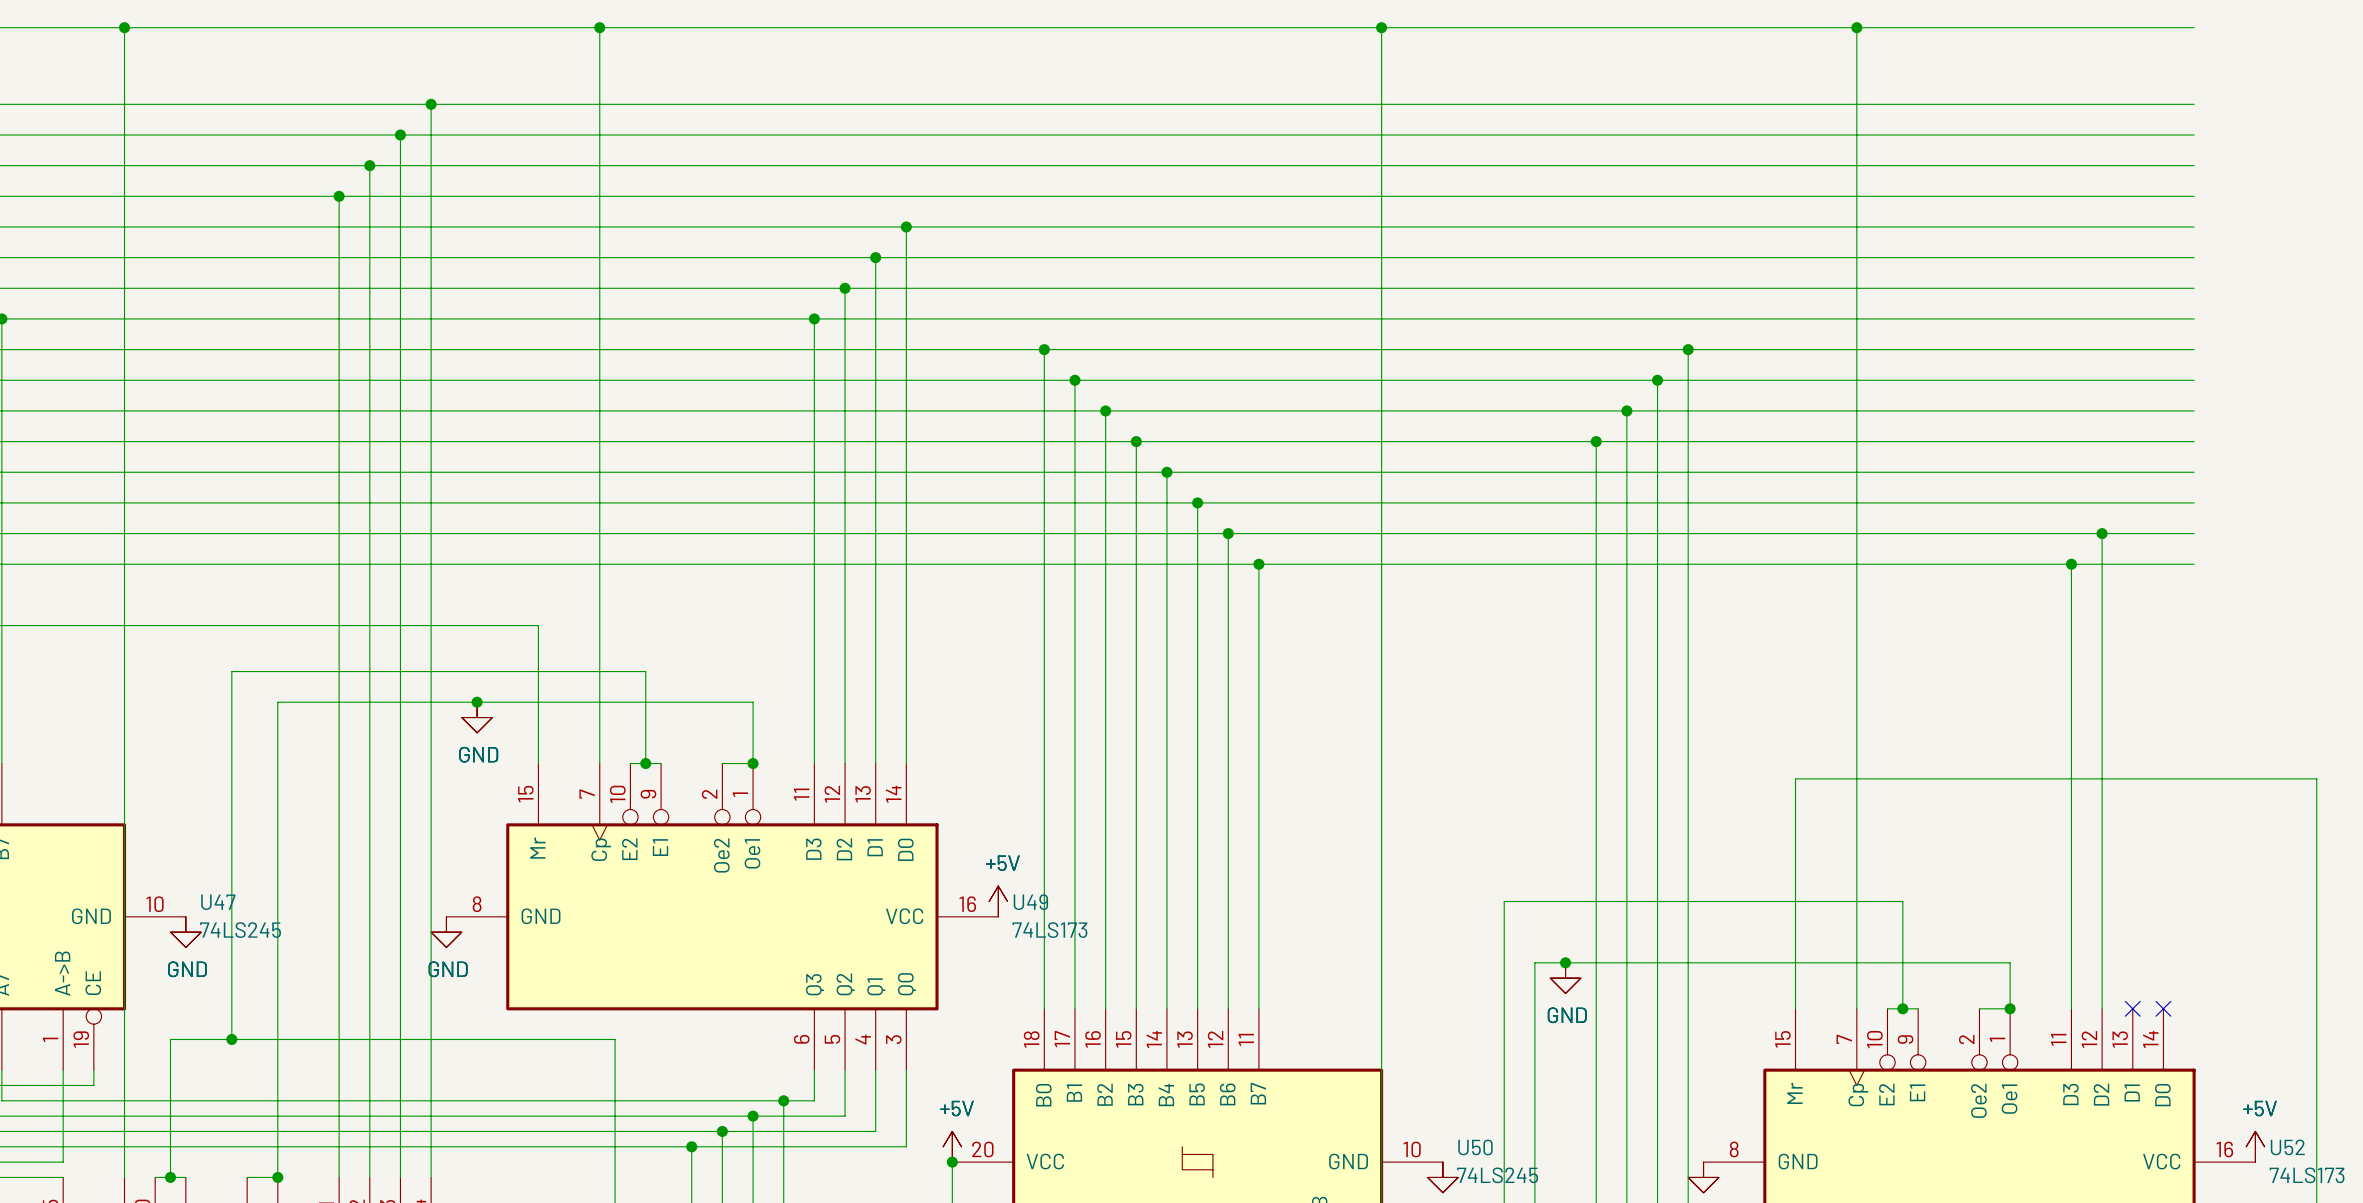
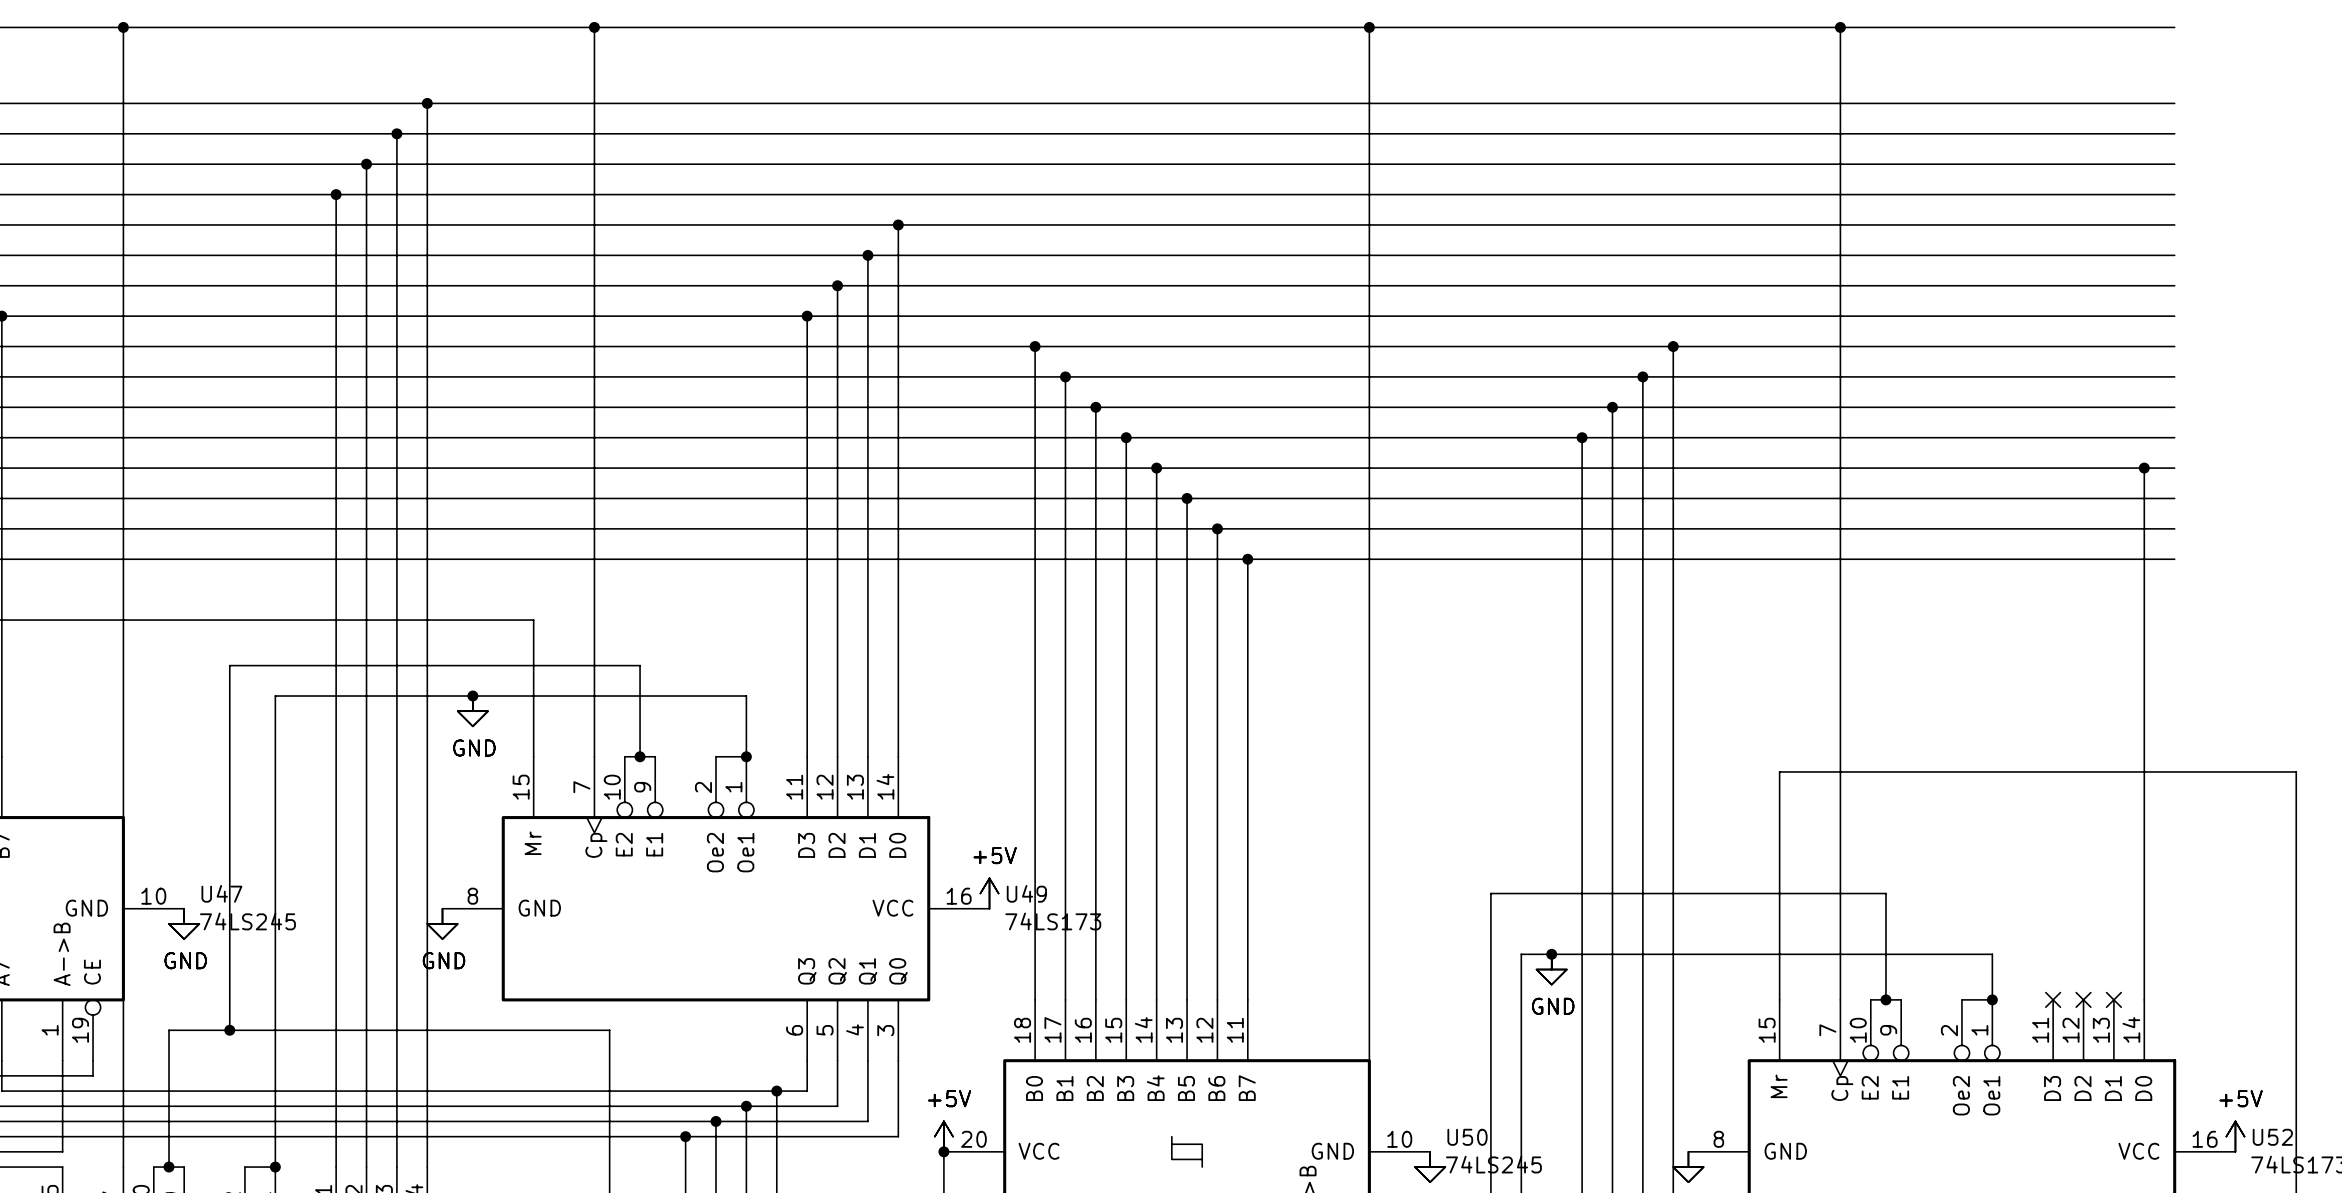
wire: none -> (2144, 468) (2144, 999)
junction: none -> (2144, 468)
wire: (2102, 533) (2102, 1008) -> none
junction: (2102, 533) -> none
wire: (2071, 564) (2071, 1008) -> none
junction: (2071, 564) -> none
no-connect mark: none -> (2053, 999)
no-connect mark: none -> (2083, 999)
no-connect mark: (2163, 1008) -> none

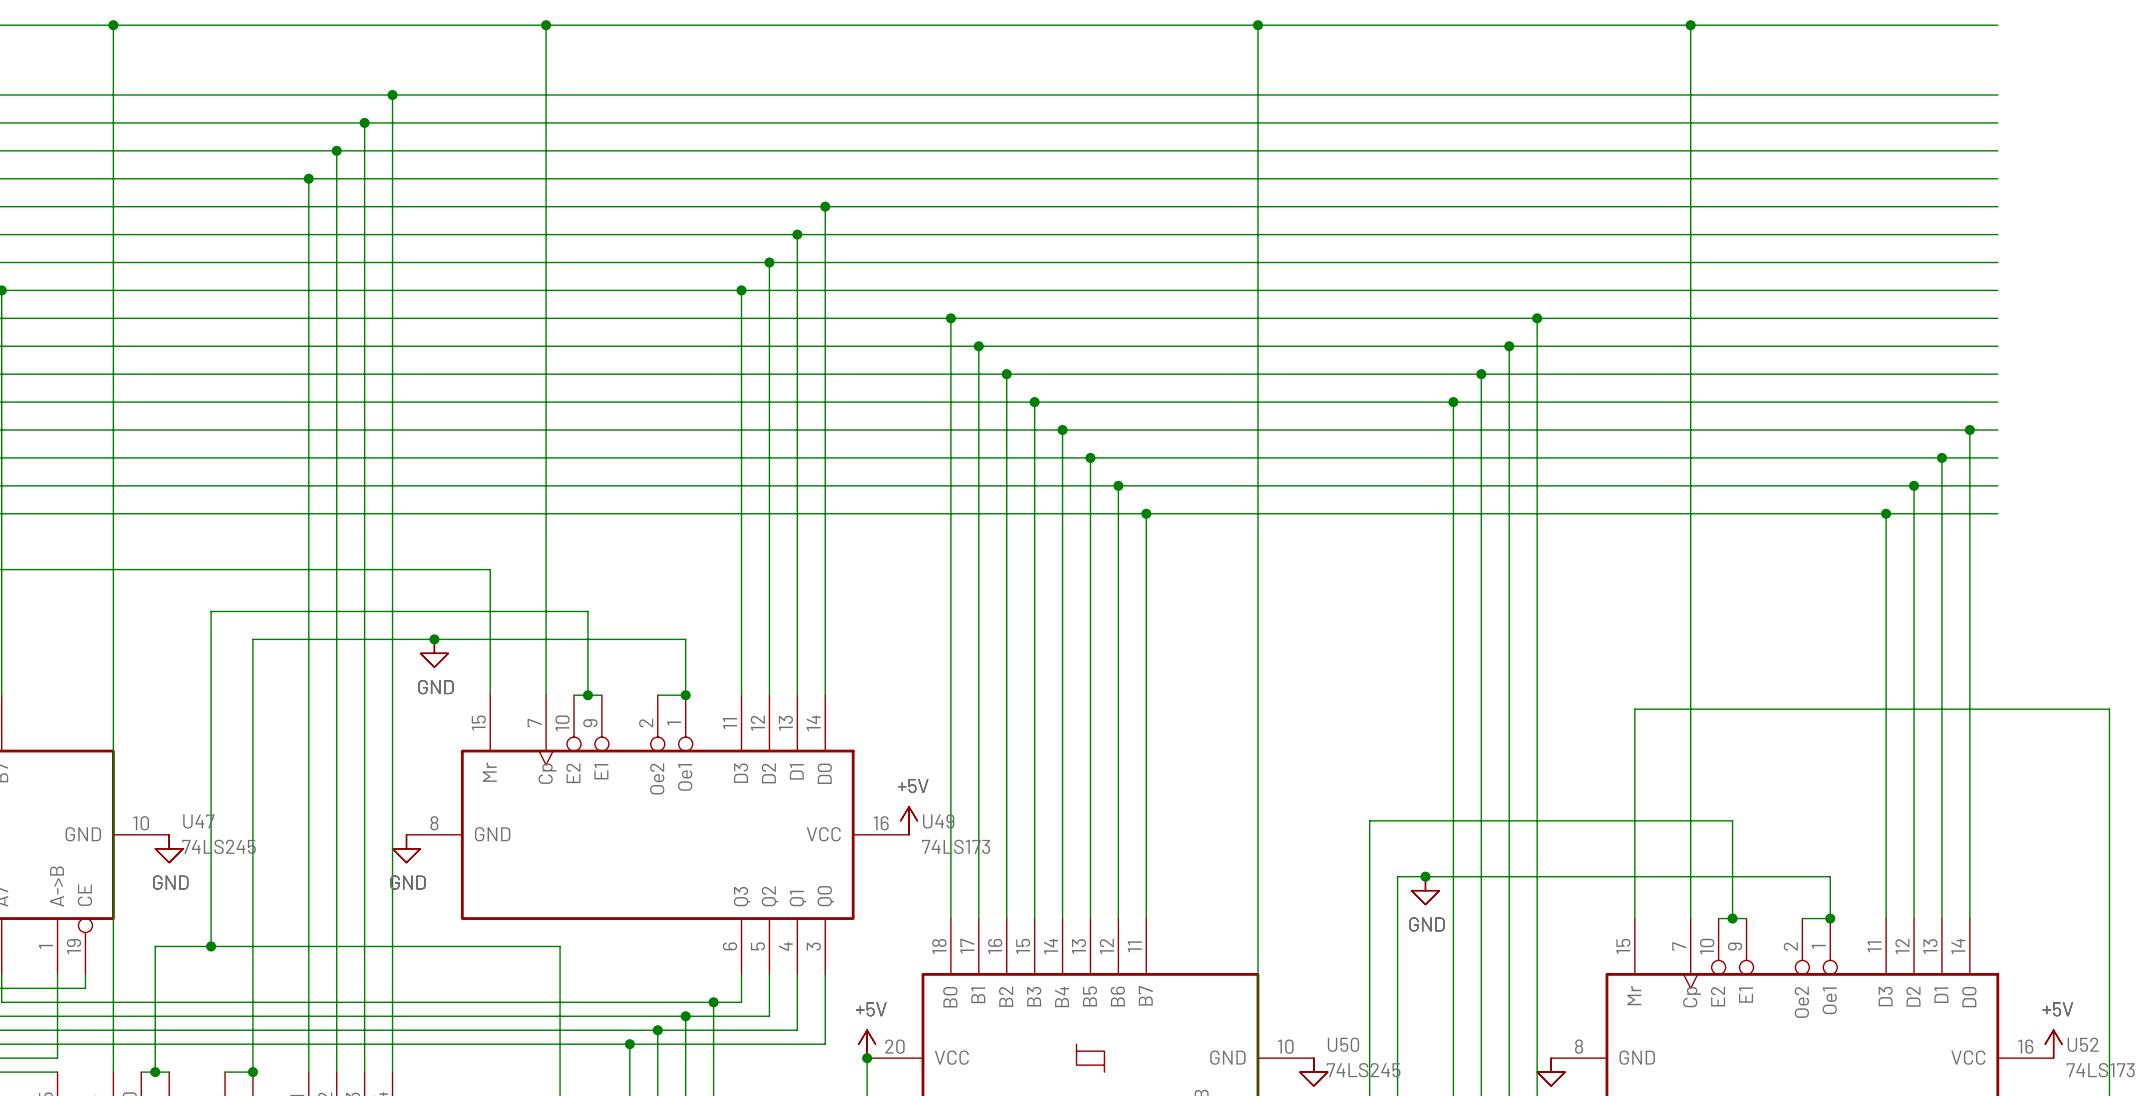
wire: none -> (1941, 457) (1941, 918)
junction: none -> (1941, 457)
wire: none -> (1914, 485) (1914, 918)
junction: none -> (1914, 485)
wire: none -> (1886, 513) (1886, 918)
junction: none -> (1886, 513)
no-connect mark: (2053, 999) -> none
no-connect mark: (2083, 999) -> none
no-connect mark: (2113, 999) -> none

